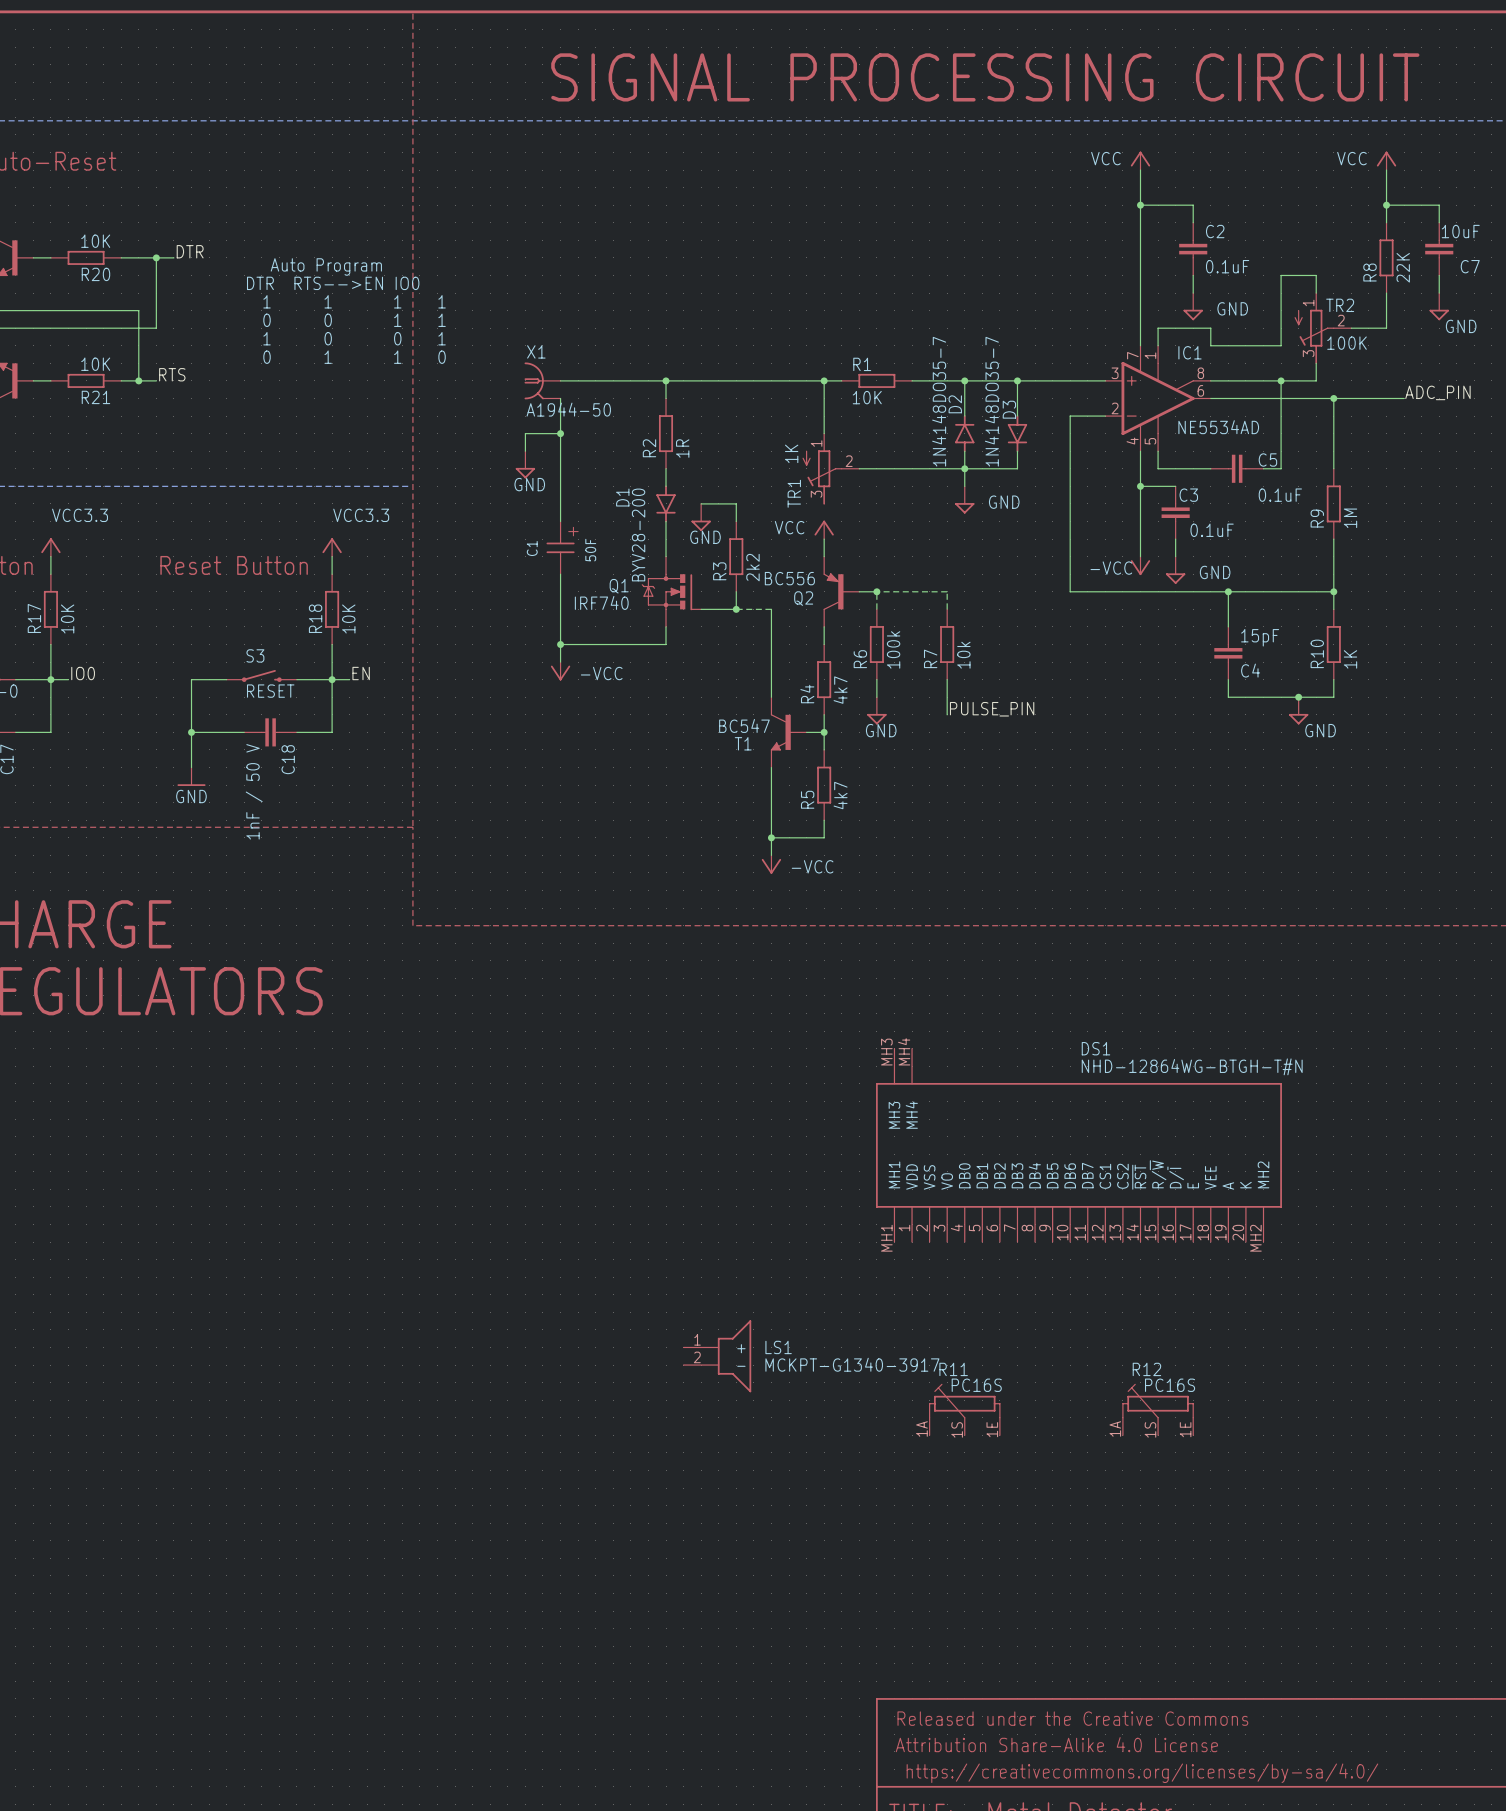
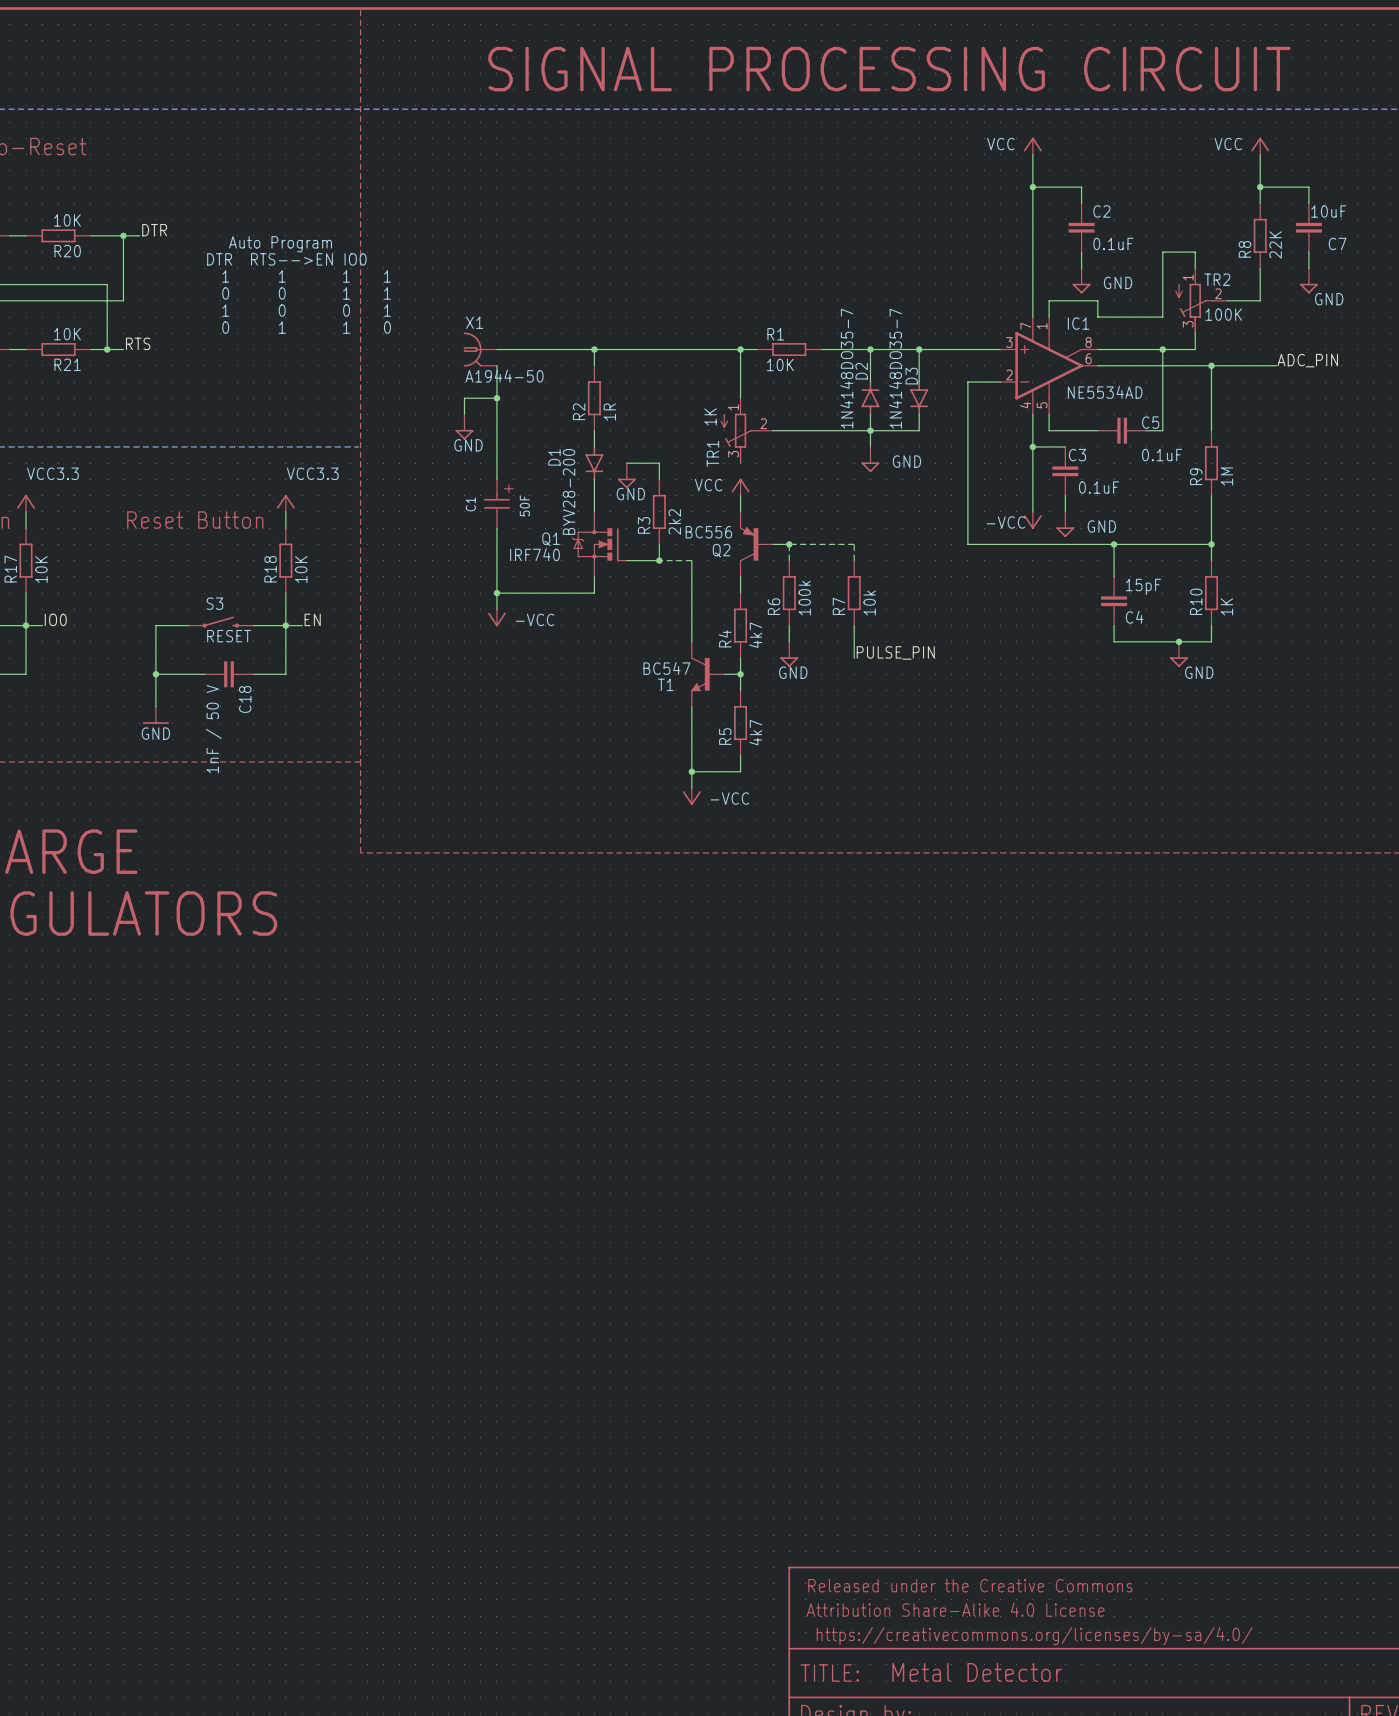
DS1: NHD-12864WG-BTGH-T#N (1078, 1145) -> none
LS1: MCKPT-G1340-3917 (717, 1356) -> none
R11: PC16S (964, 1409) -> none
R12: PC16S (1158, 1409) -> none

